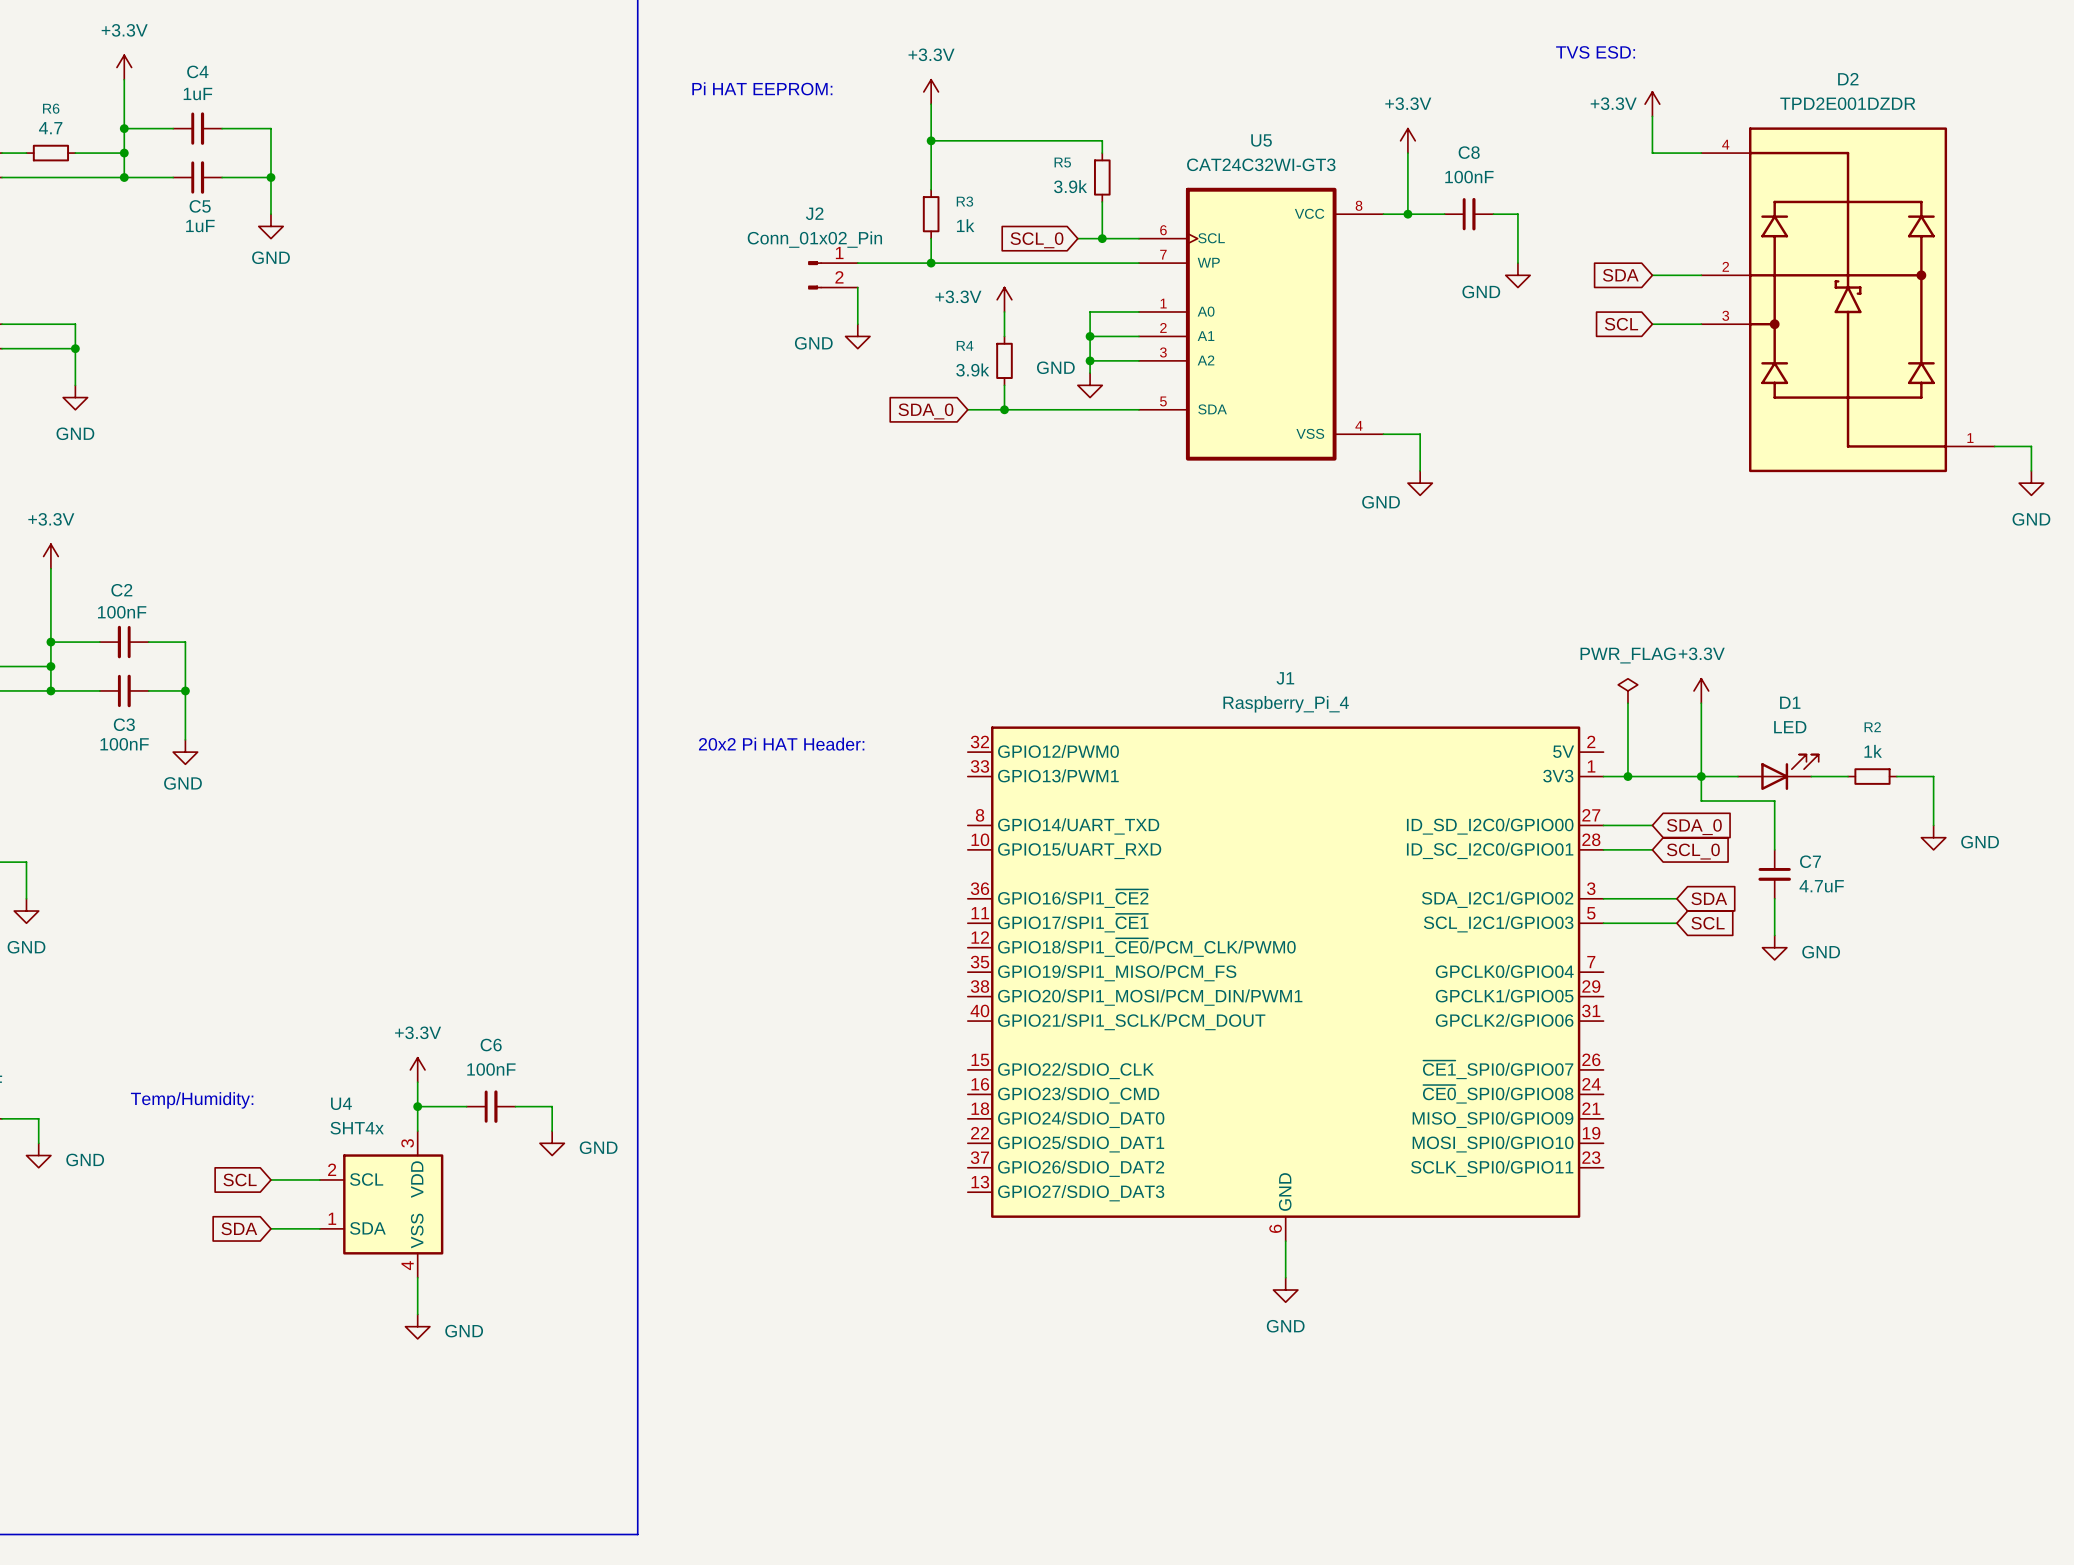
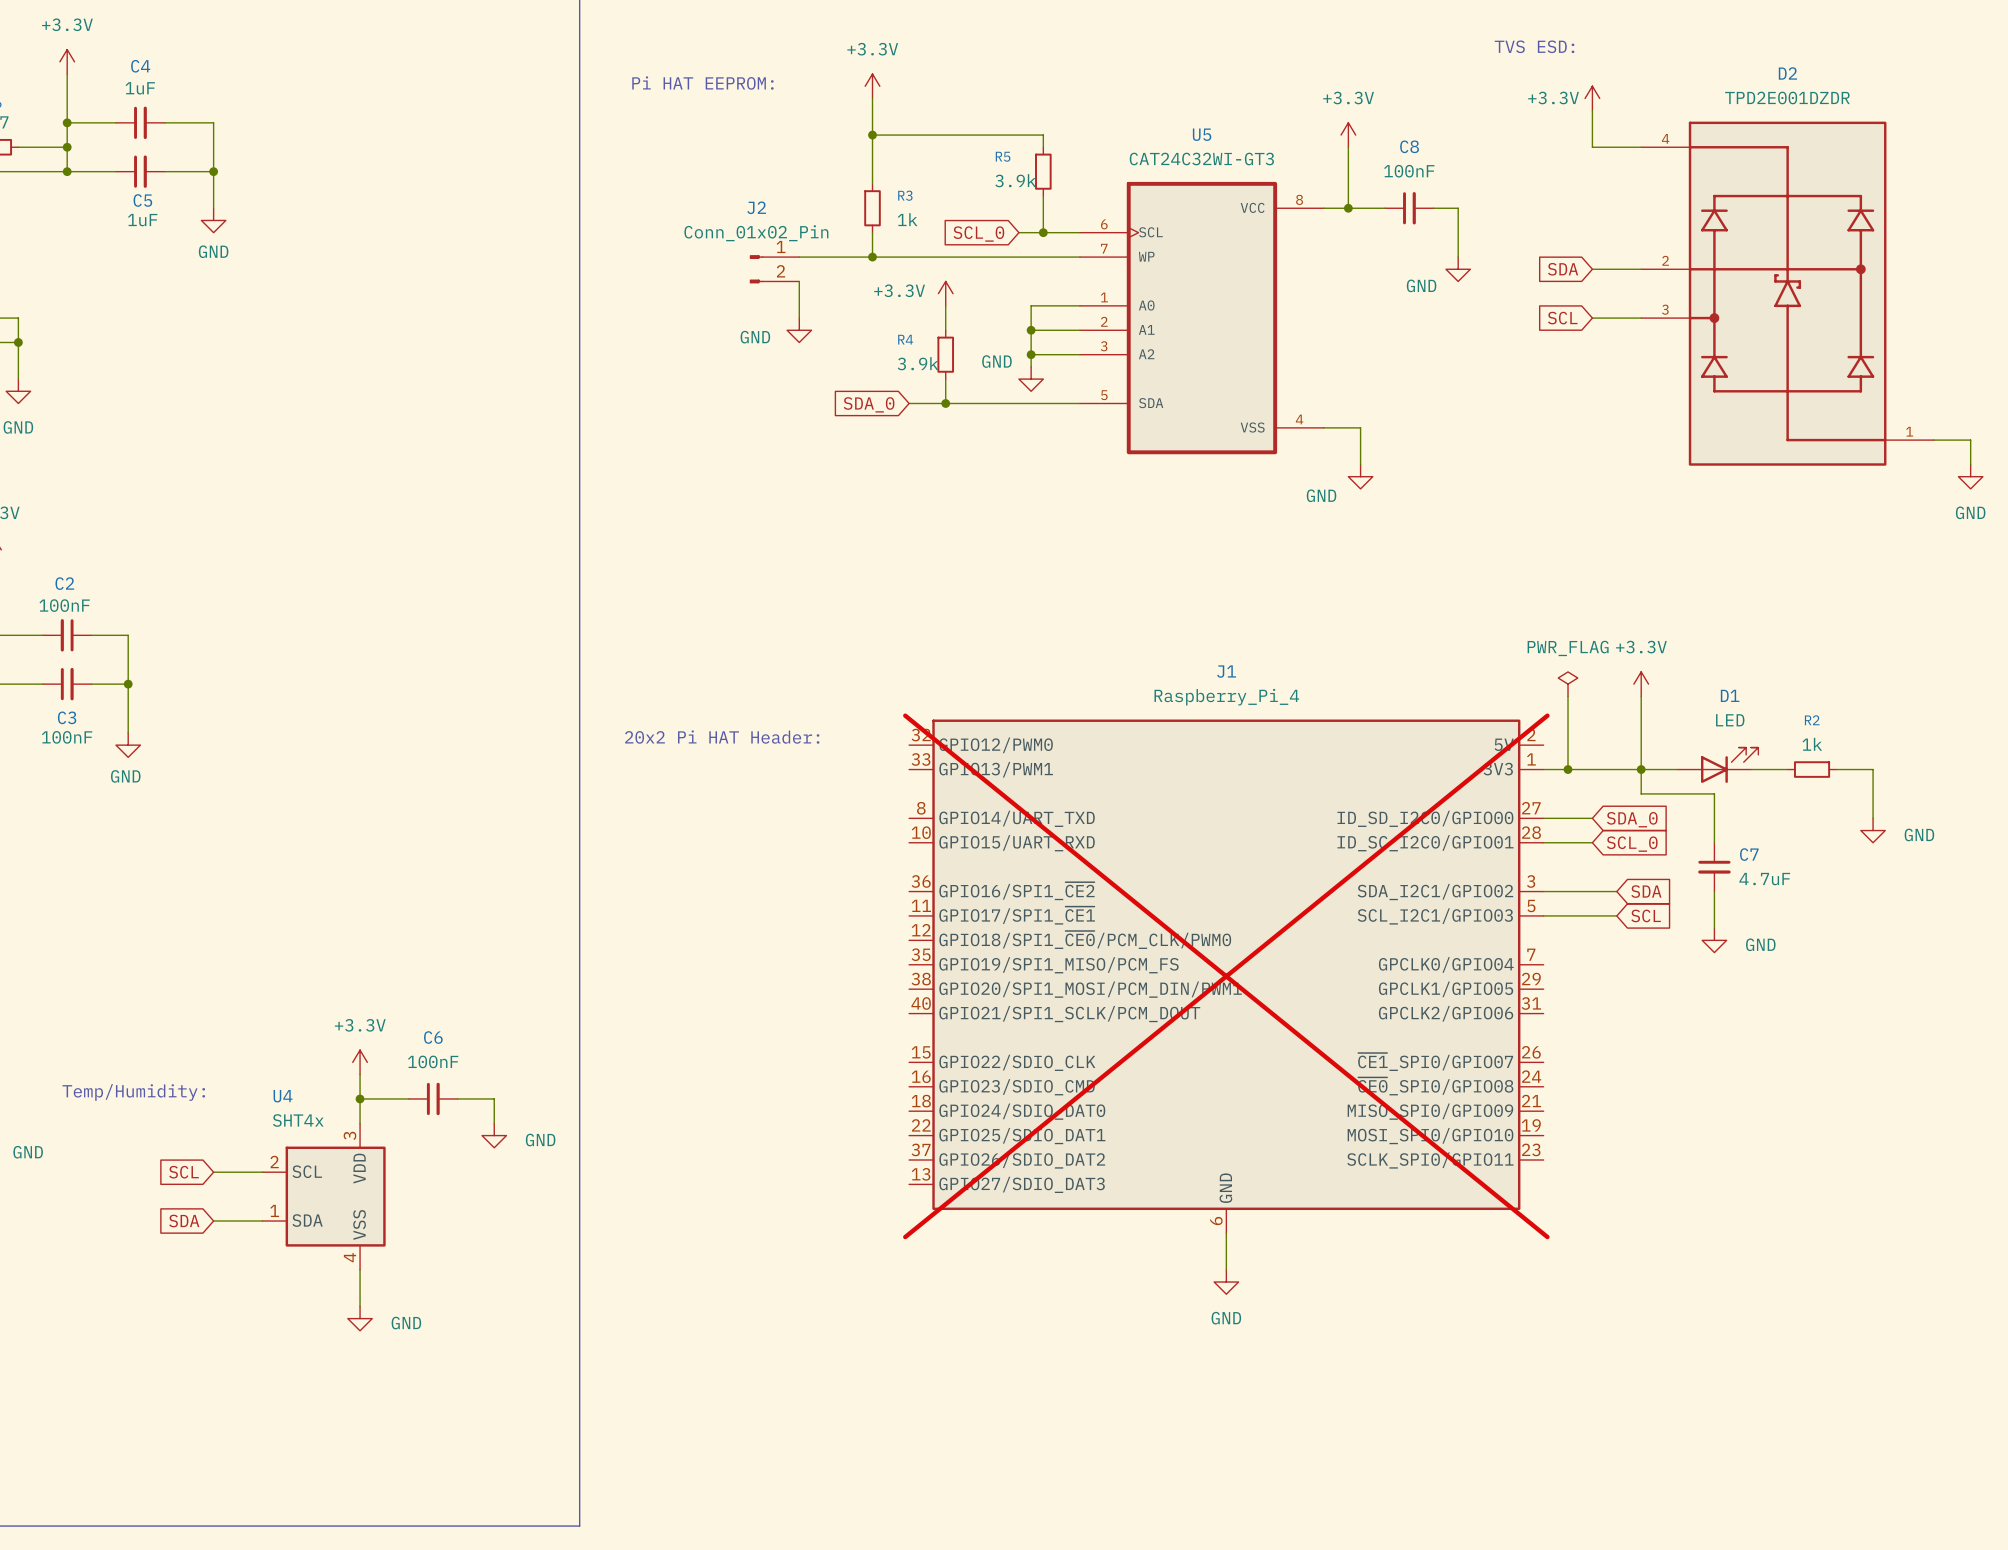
J1 do-not-place cross: none -> (1226, 976)

